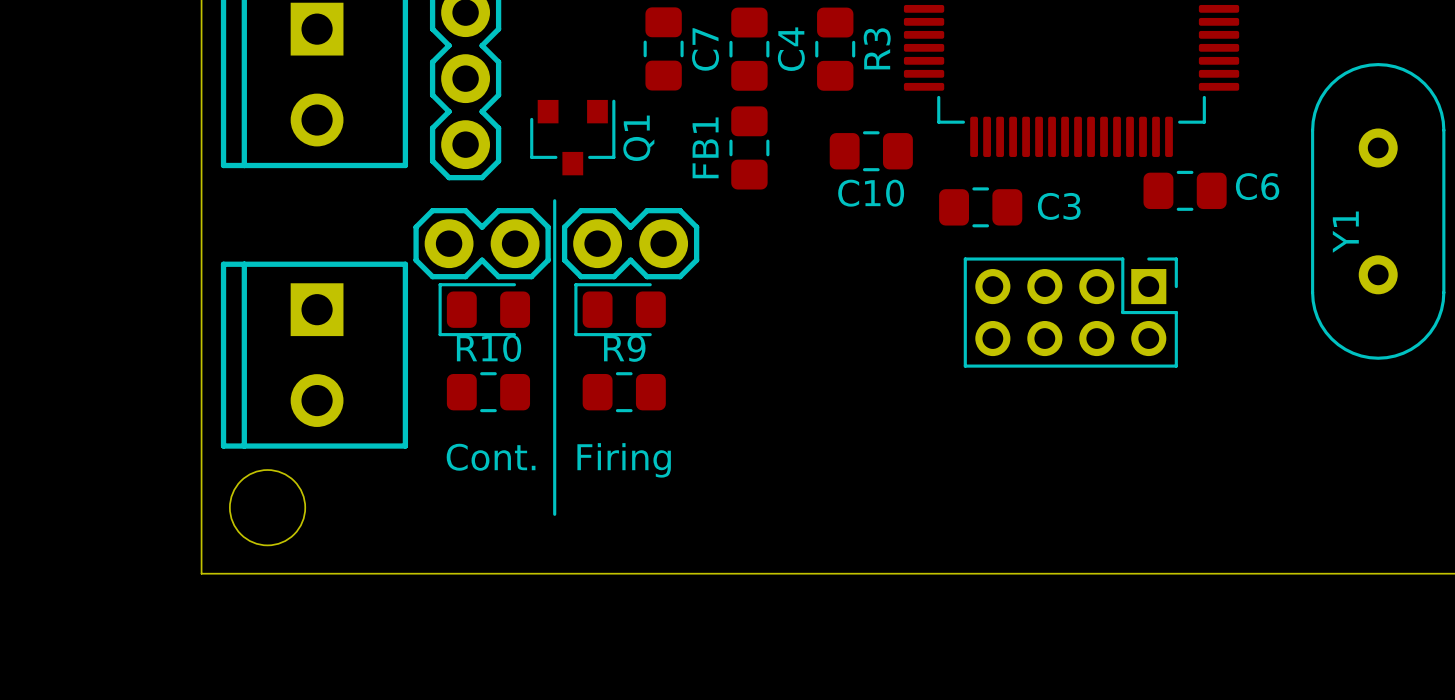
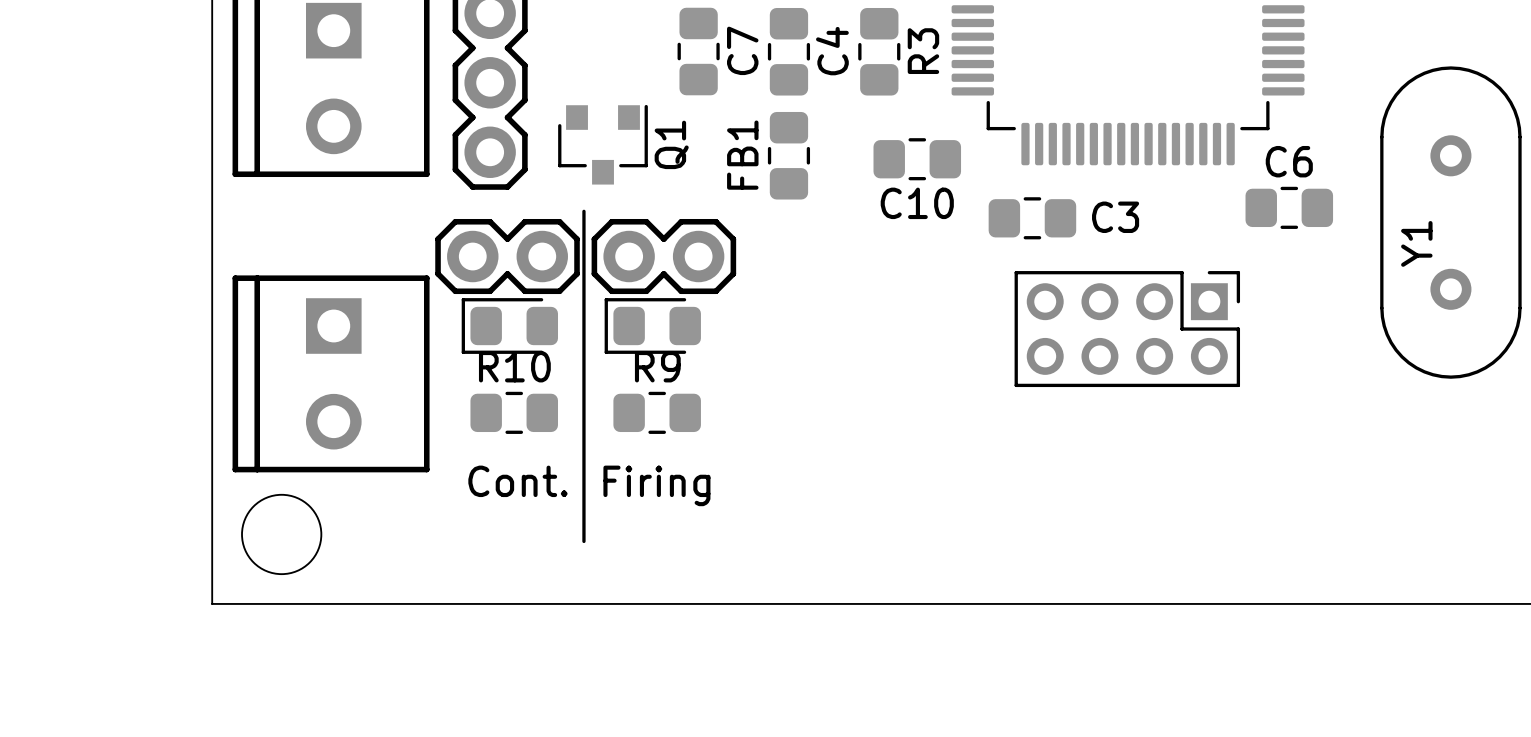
C6 name position: C6 (1257, 186) -> C6 (1289, 161)
C6 position: (1185, 190) -> (1289, 207)

